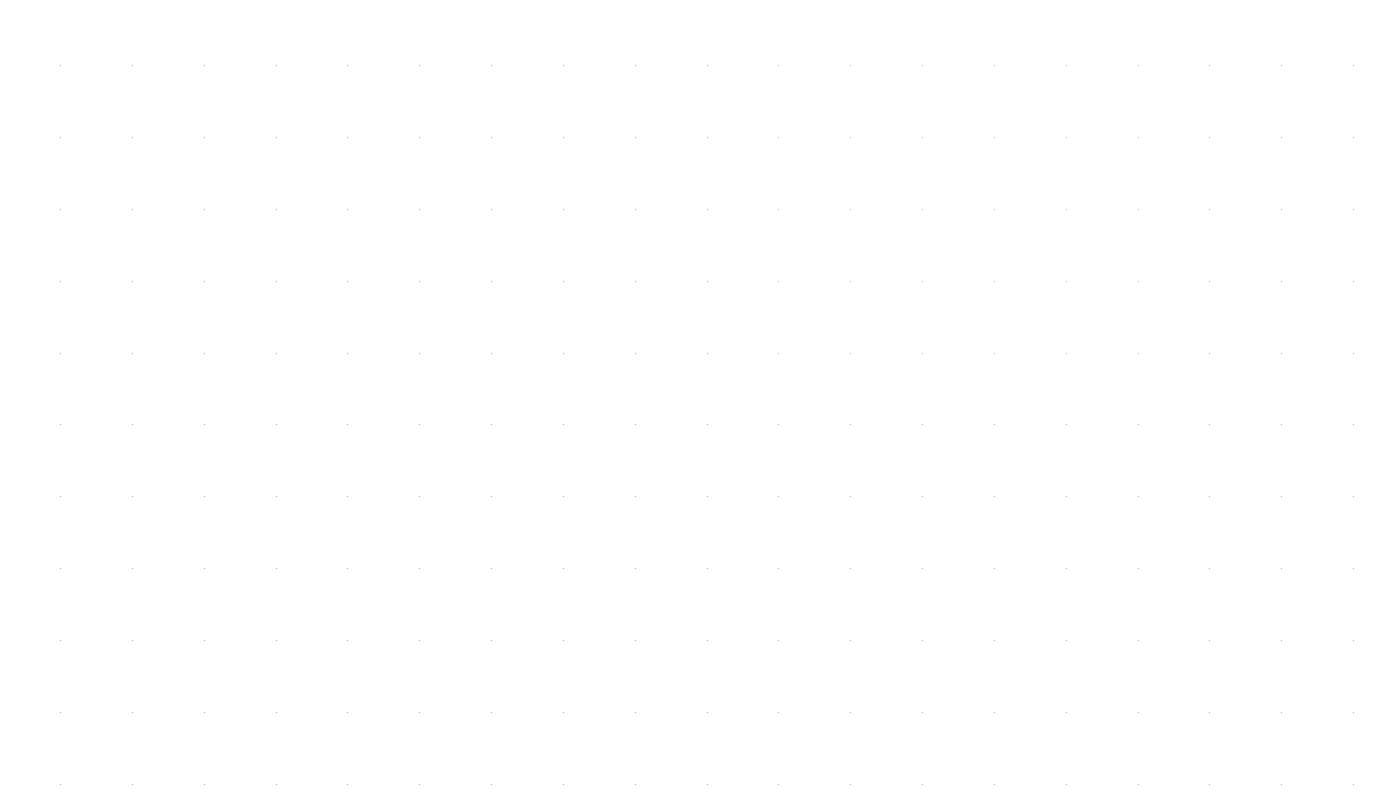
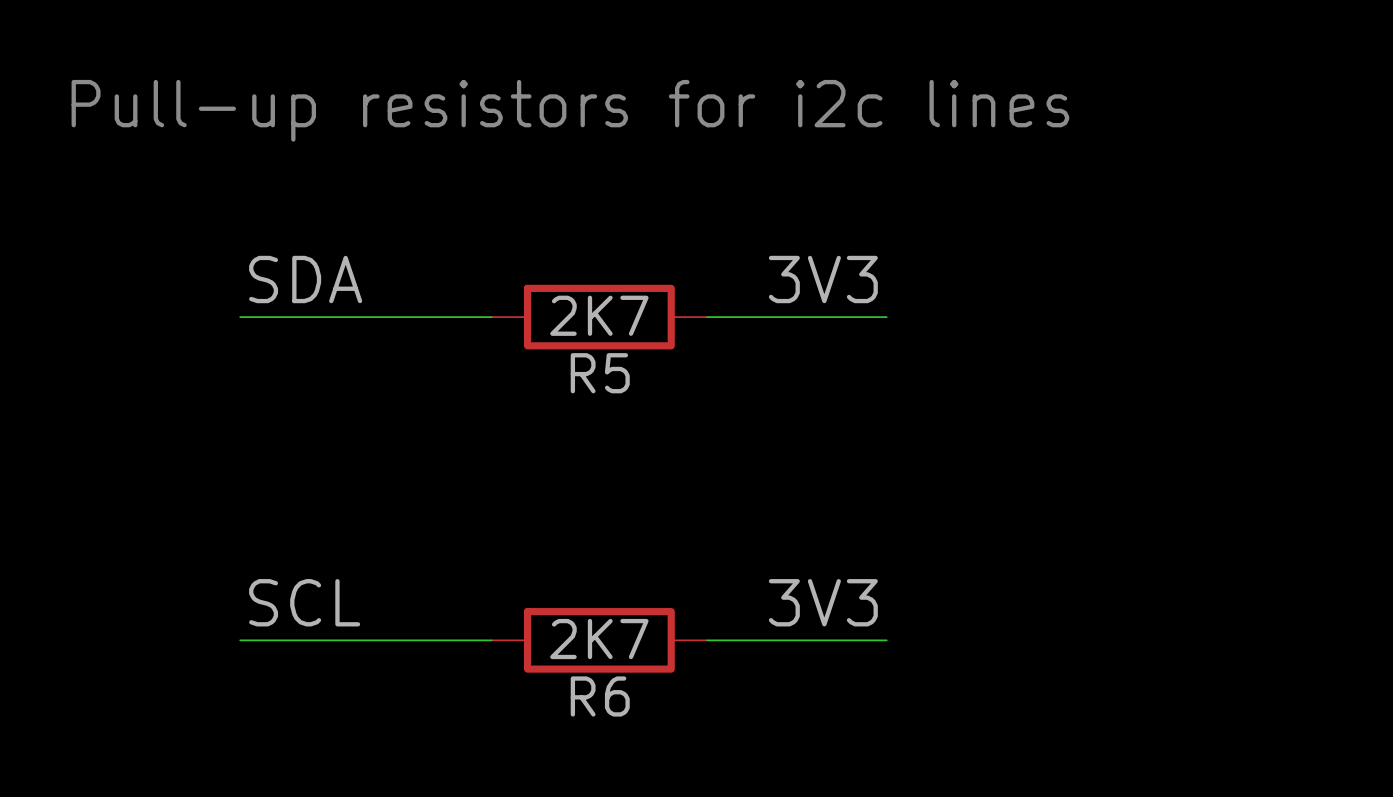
text: none -> Pull-up resistors for i2c lines (570, 110)
label: none -> SDA (305, 279)
label: none -> 3V3 (823, 279)
wire: none -> (240, 317) (491, 317)
R5: none -> 2K7 (599, 317)
wire: none -> (707, 317) (886, 317)
label: none -> SCL (304, 602)
label: none -> 3V3 (823, 602)
wire: none -> (240, 640) (491, 640)
R6: none -> 2K7 (599, 640)
wire: none -> (707, 640) (886, 640)

